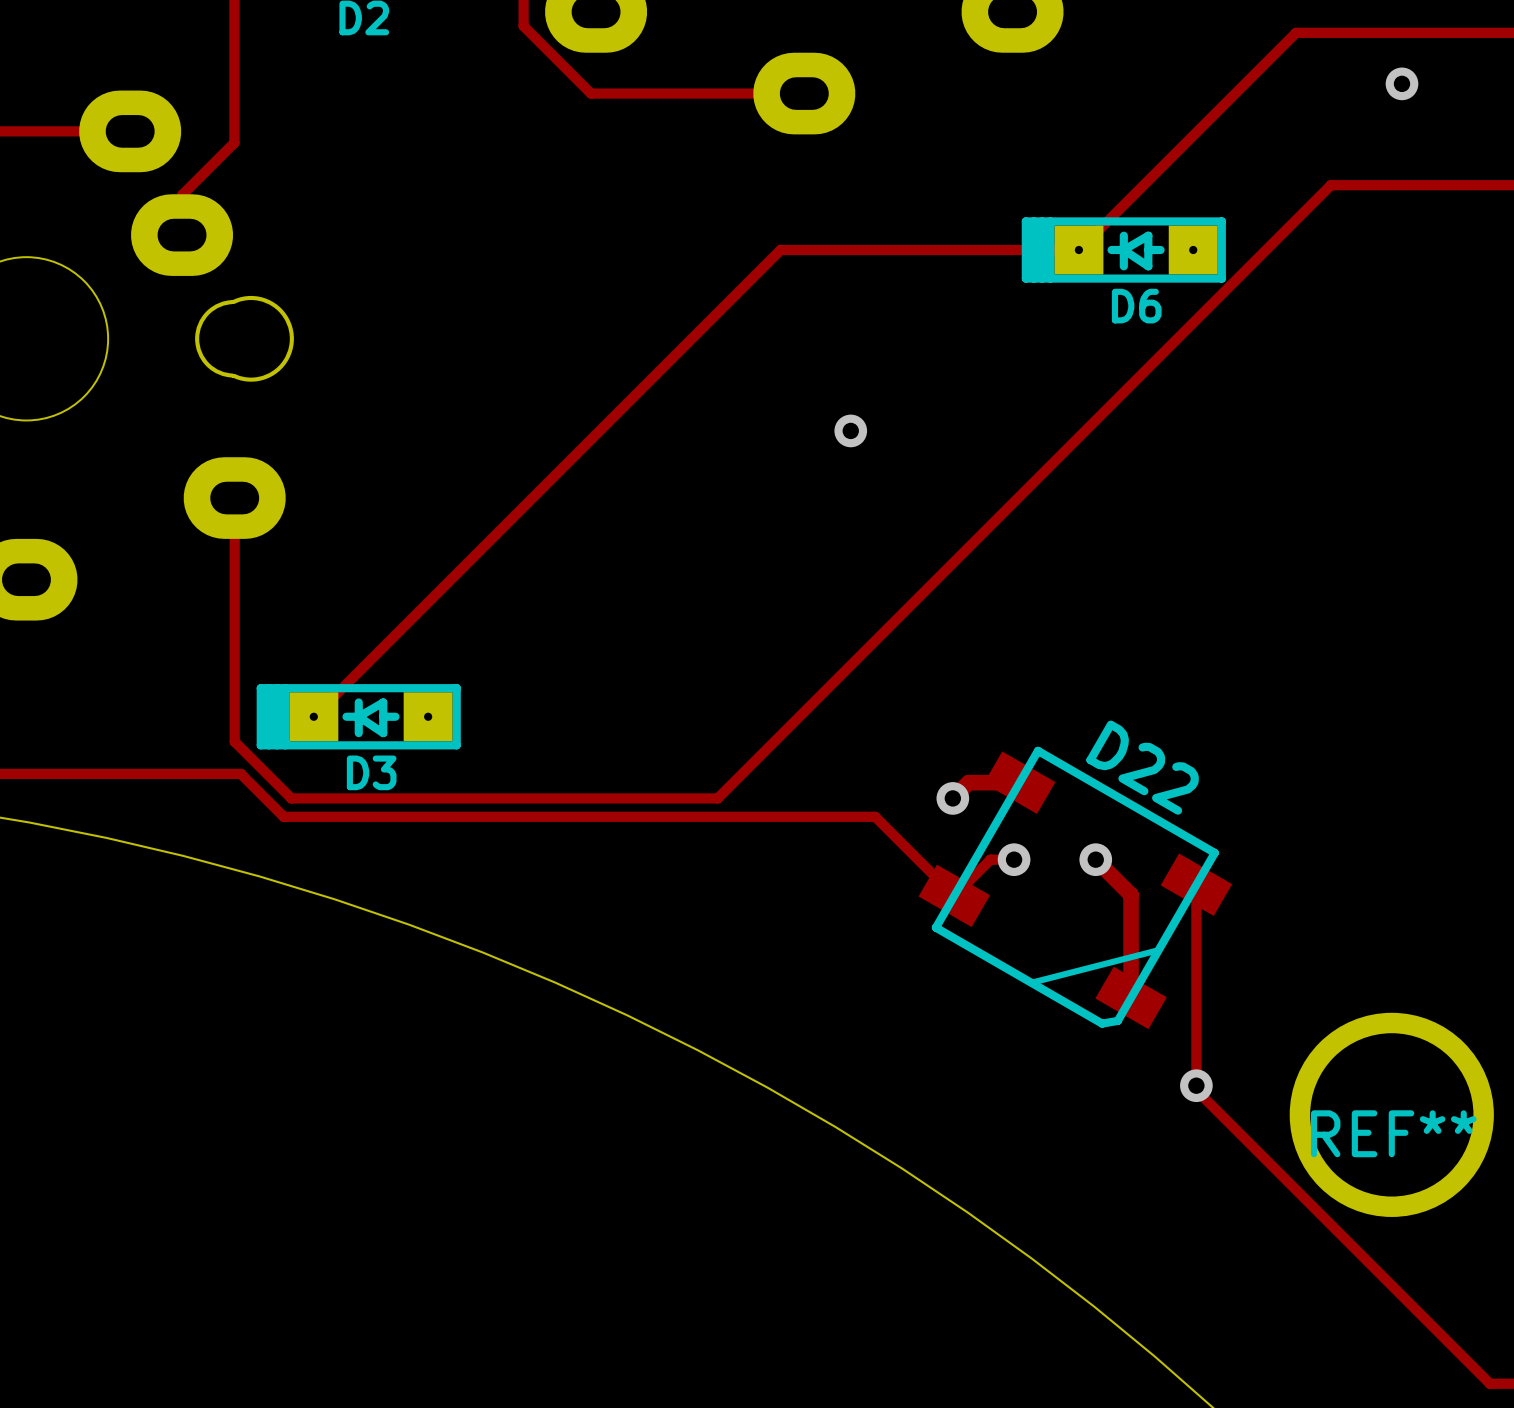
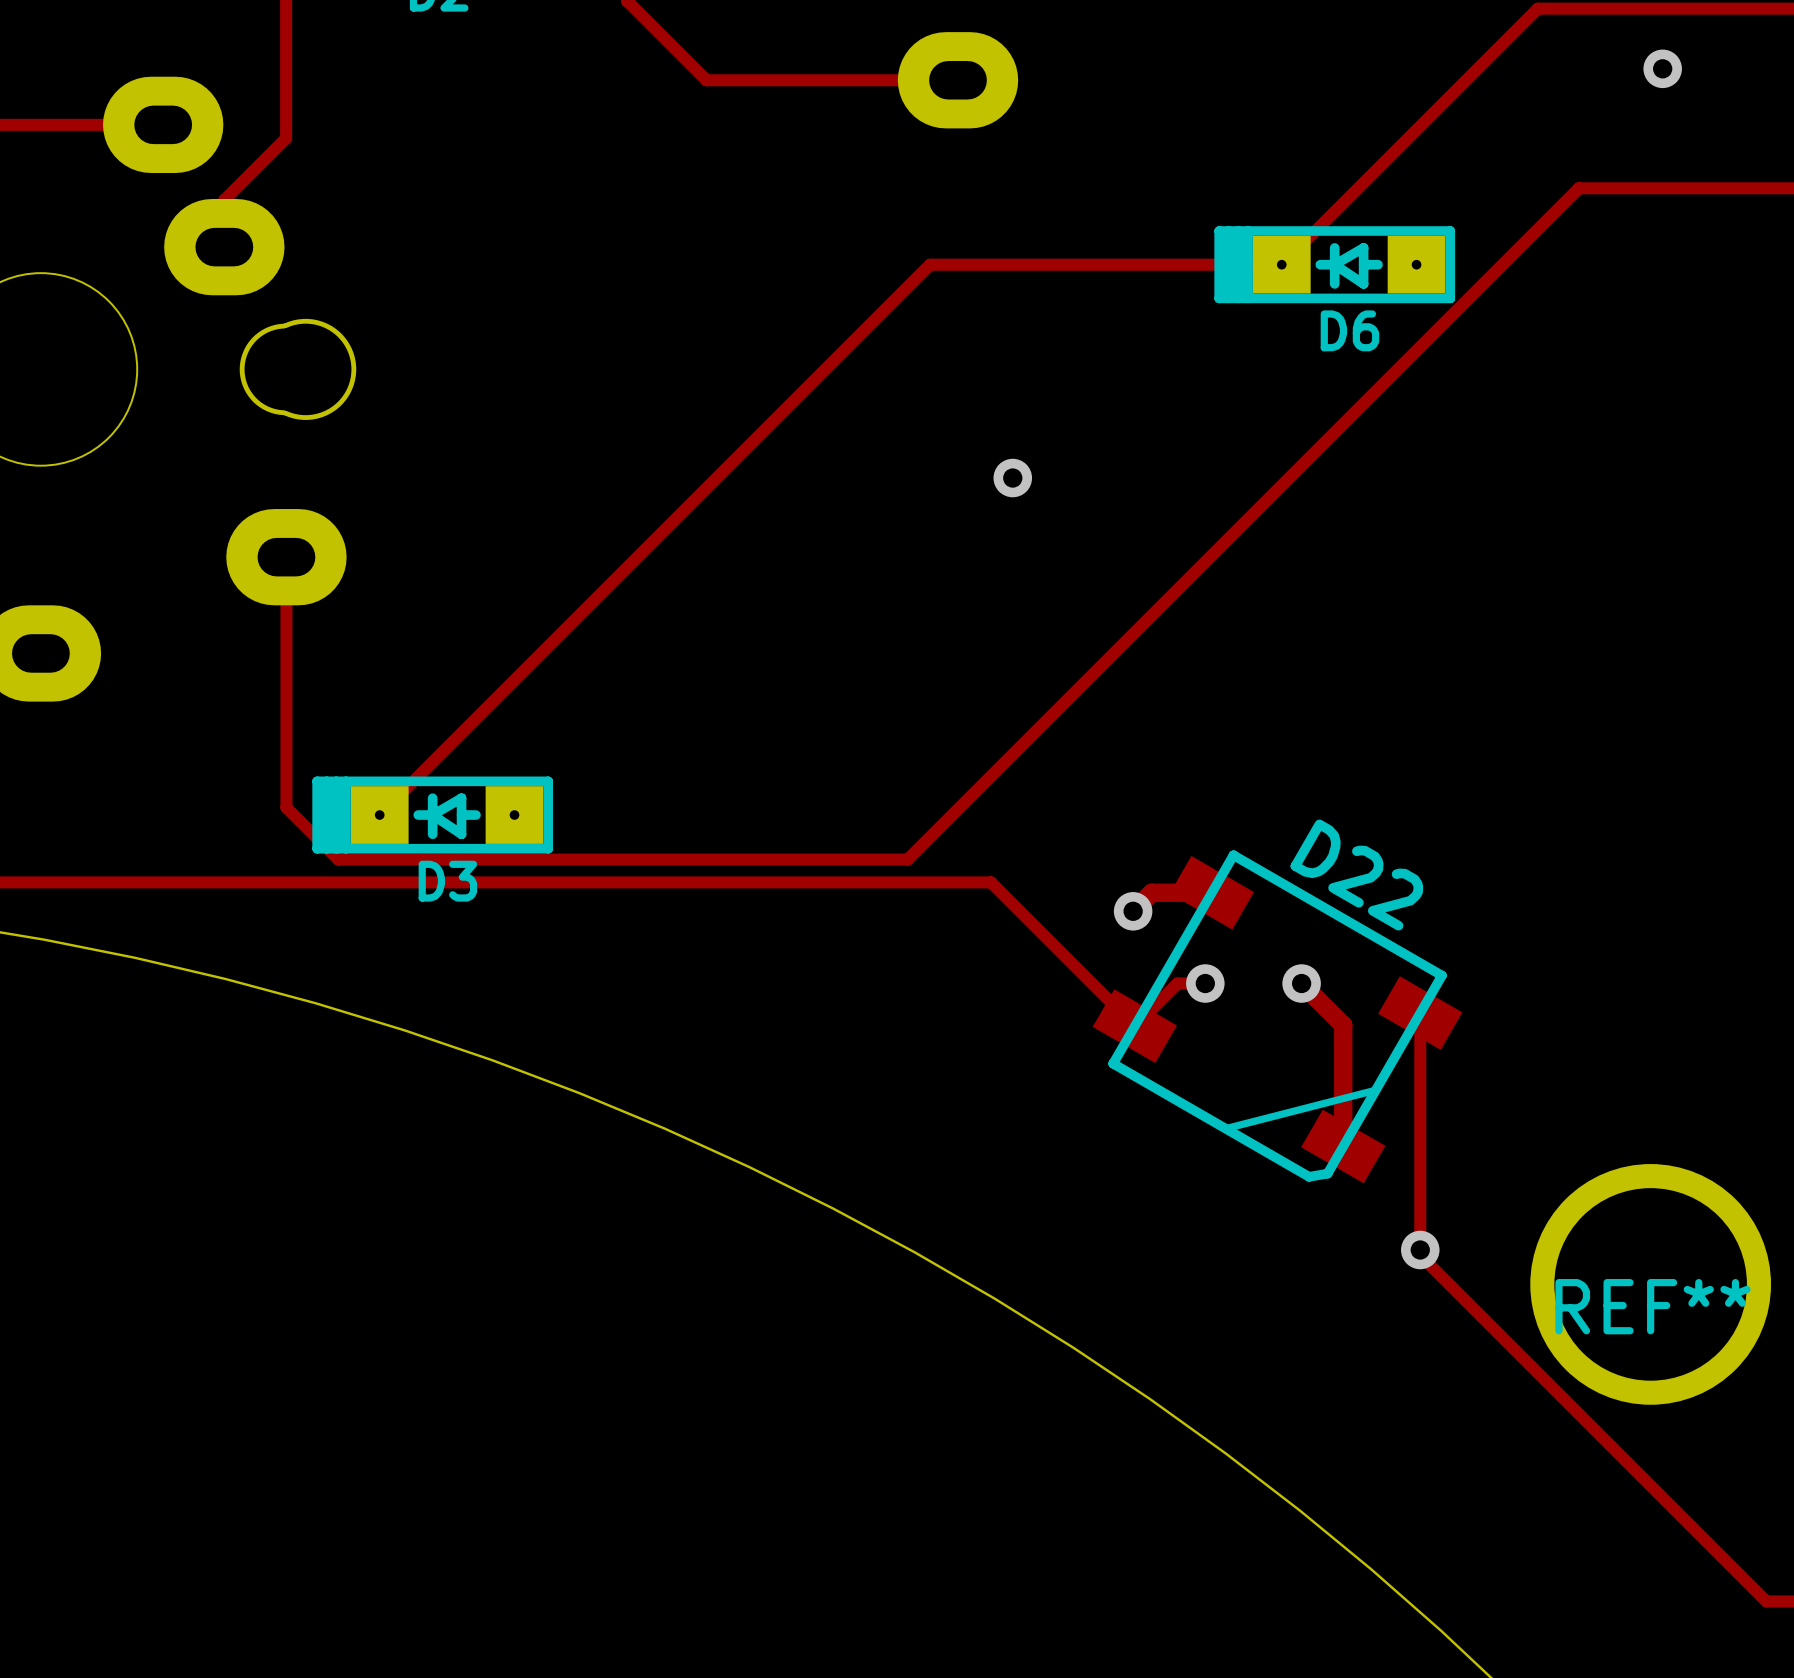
track: (234, 710) (234, 741) (291, 798) (717, 798) (761, 754) -> (286, 807) (338, 859) (907, 859)
track: (240, 773) (283, 816) (875, 816) -> (293, 882) (991, 882) (1041, 932)

